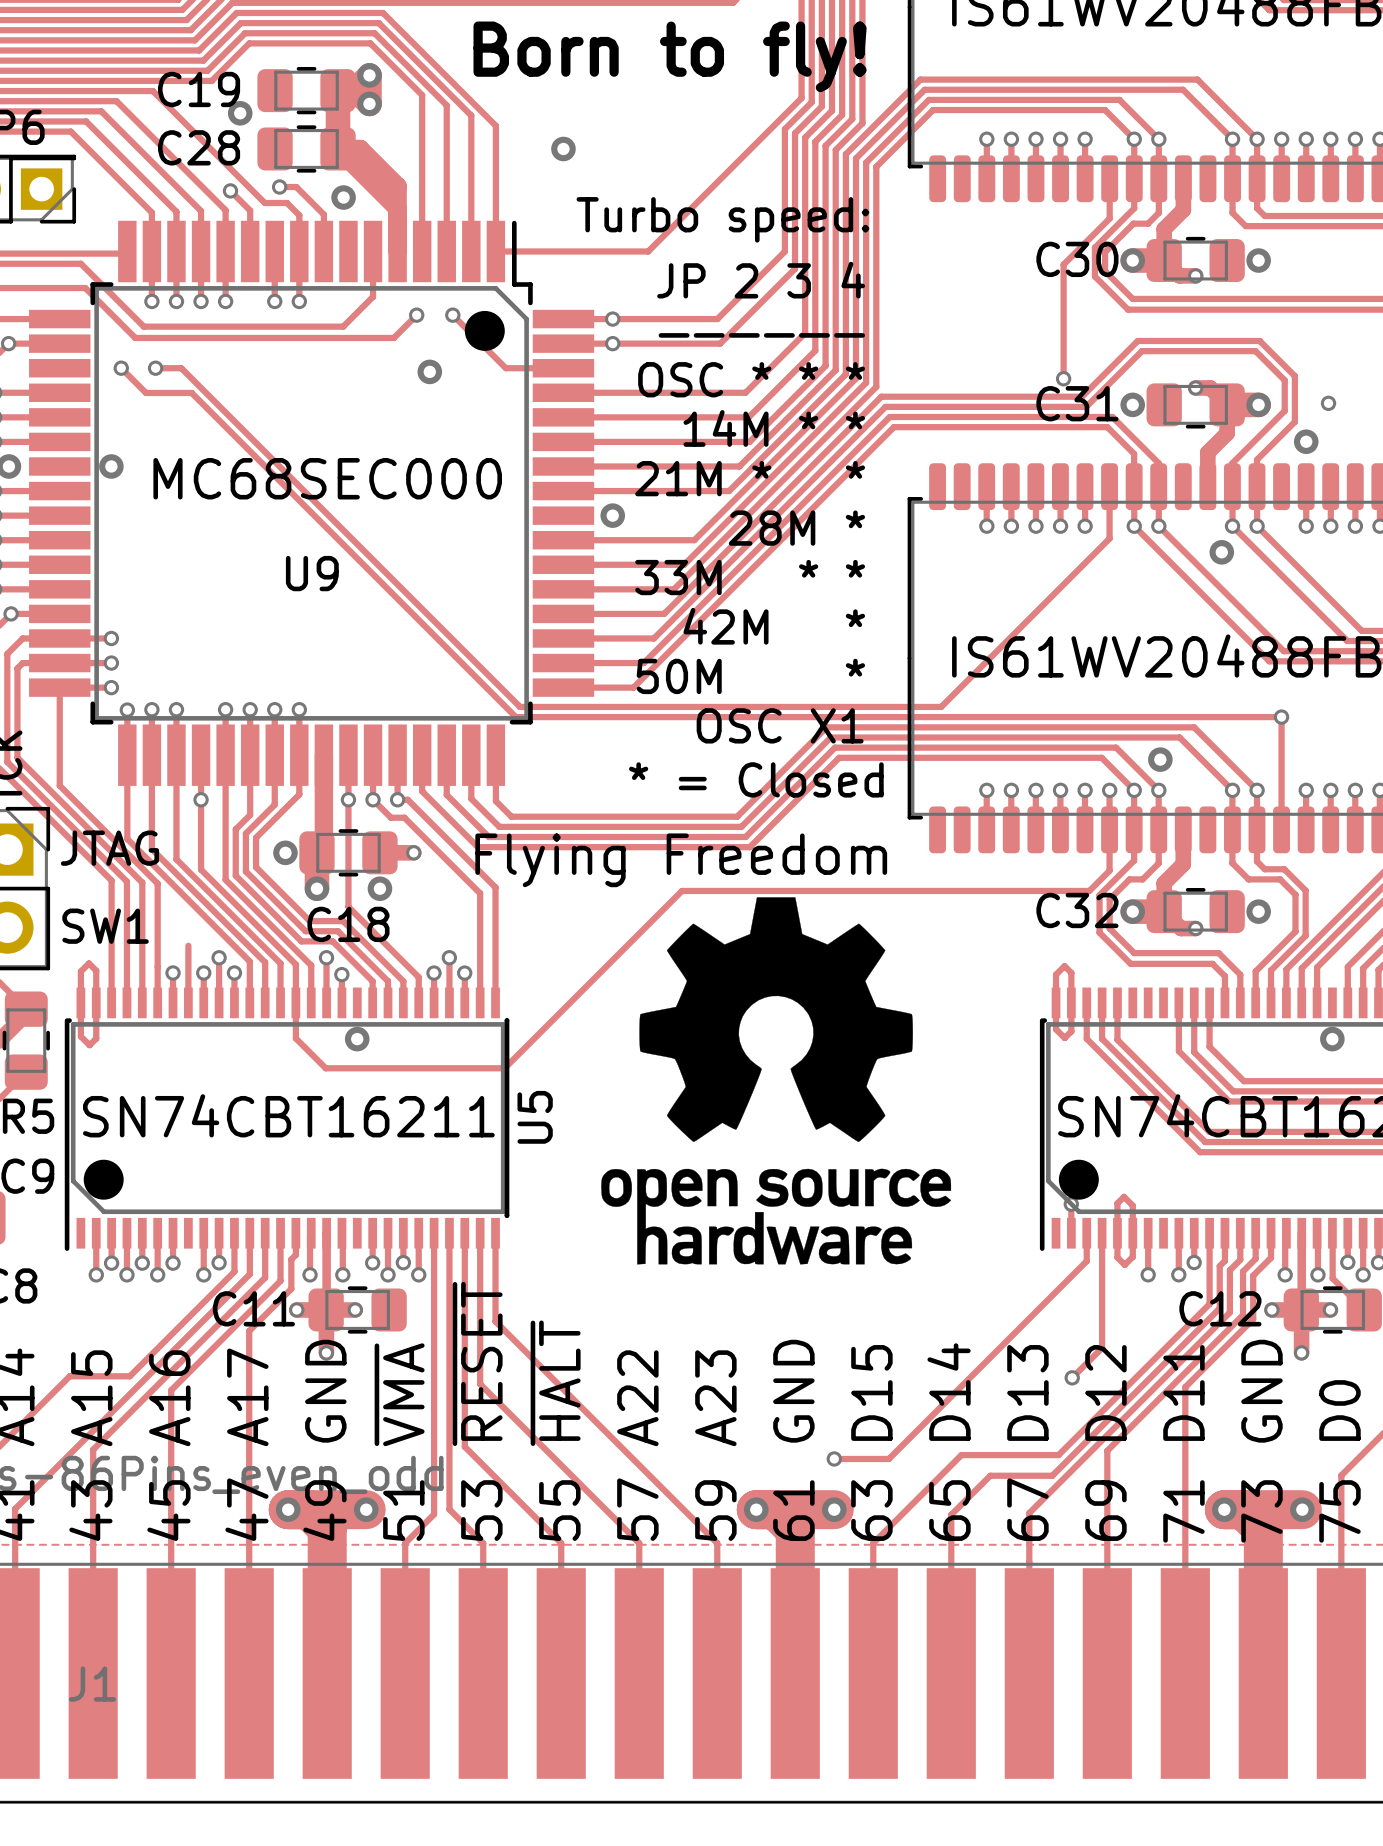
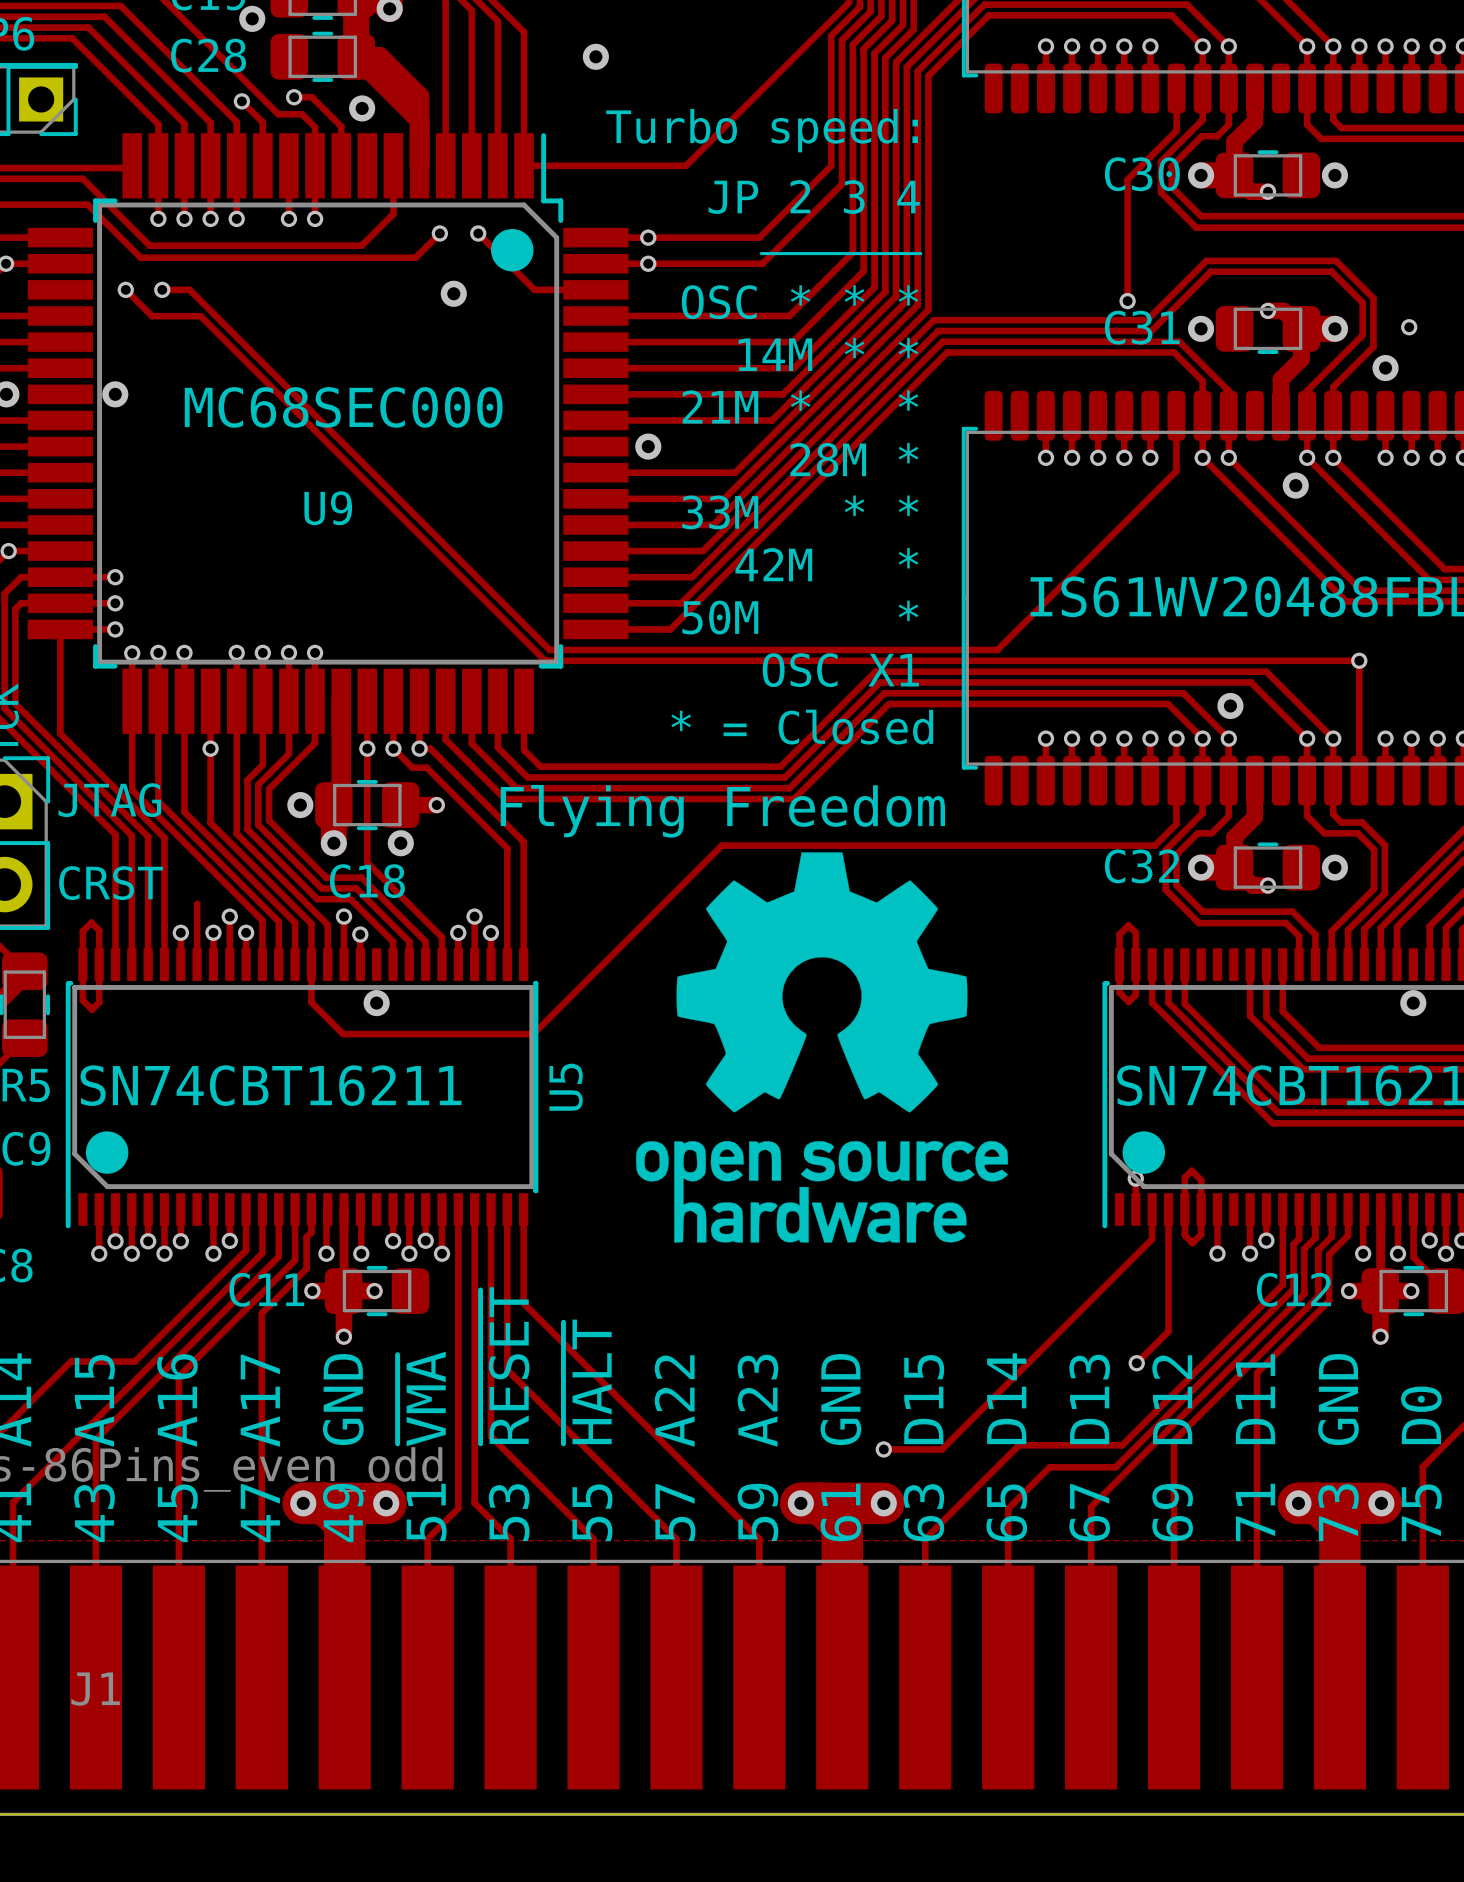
text: SW1 (105, 926) -> CRST (111, 883)

